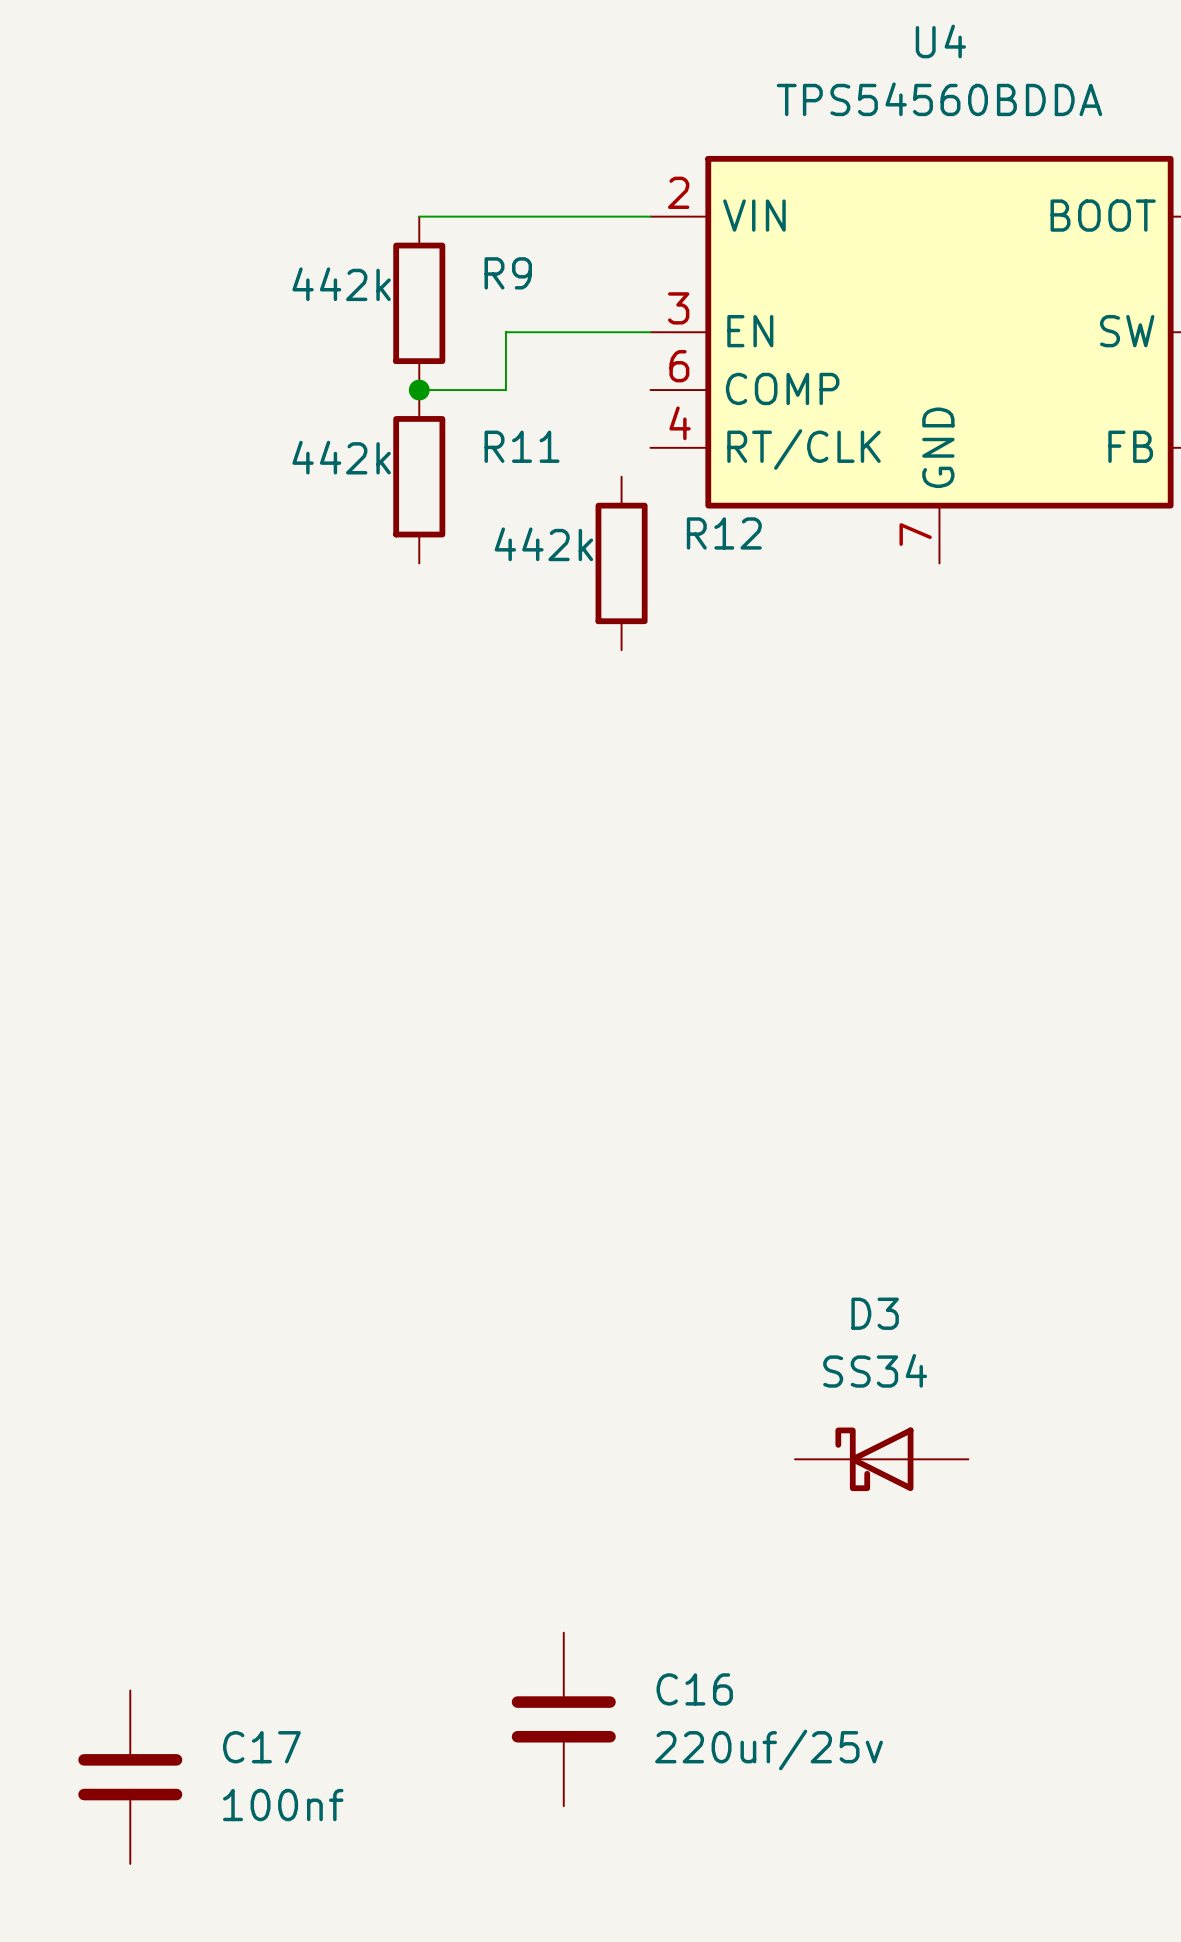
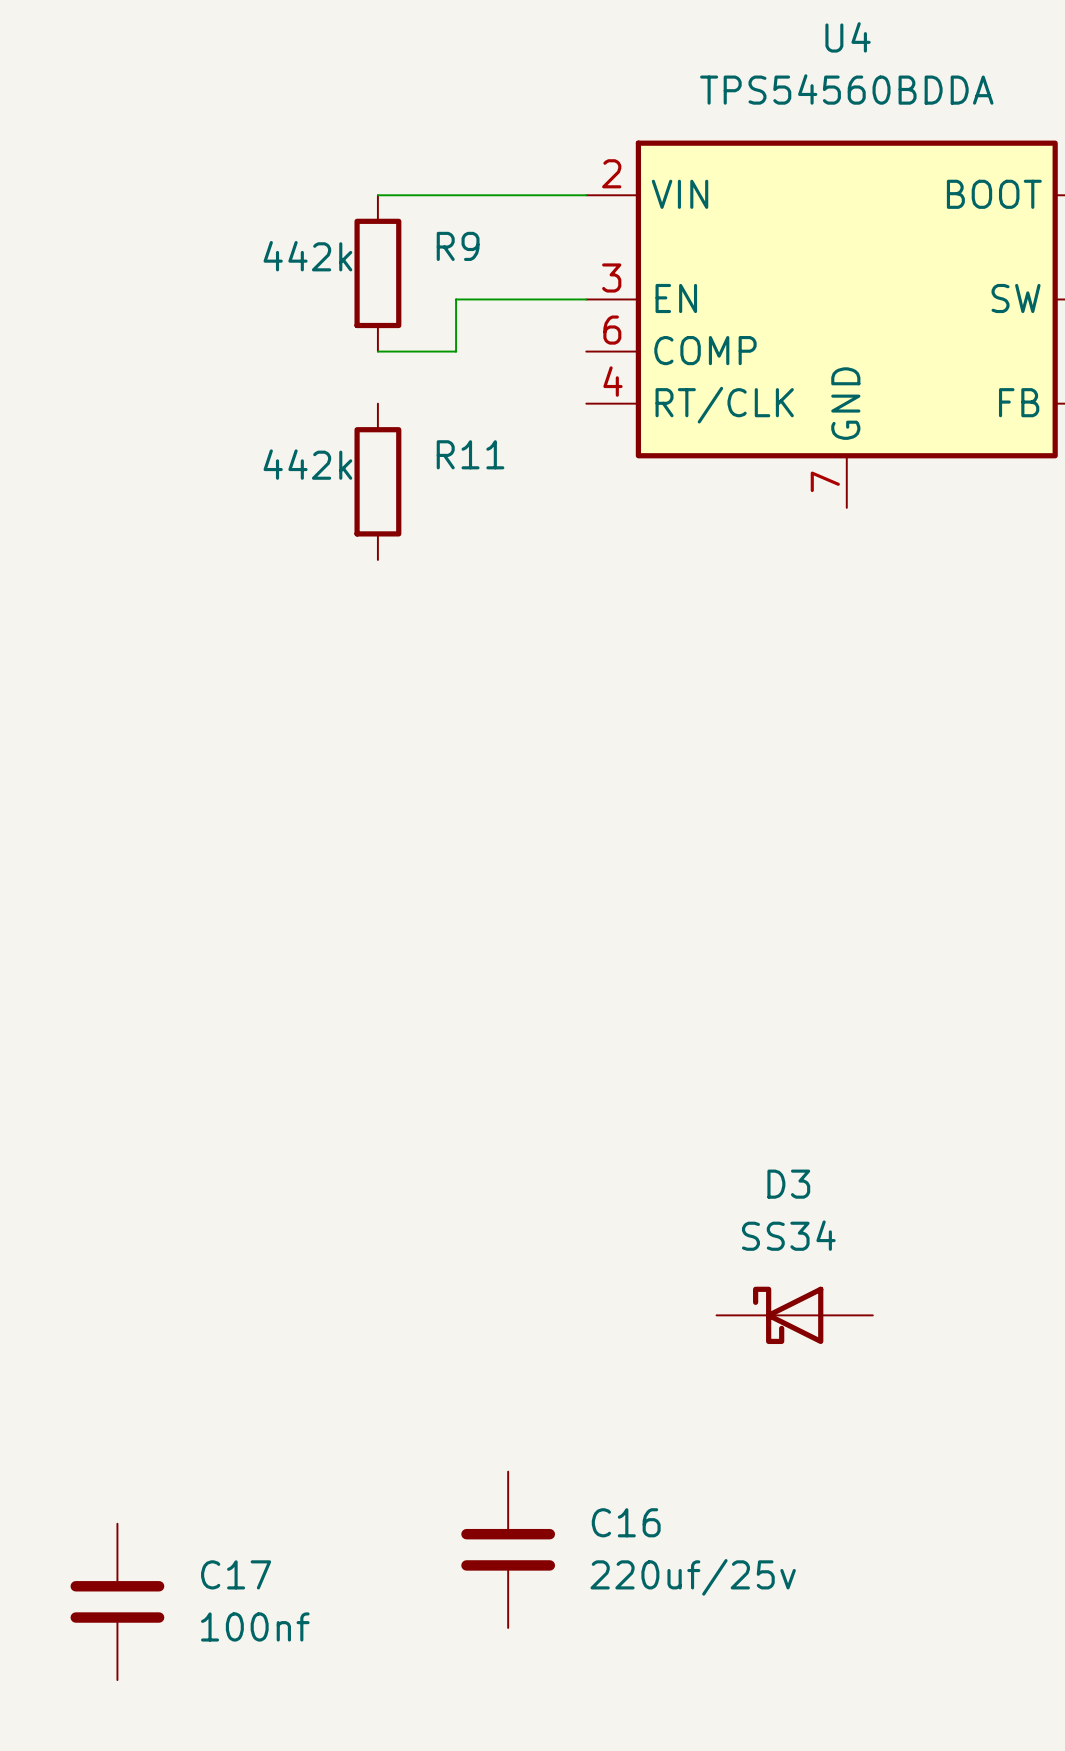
junction: (419, 390) -> none
R11 position: (419, 476) -> (377, 481)
R12: 442k (621, 563) -> none

